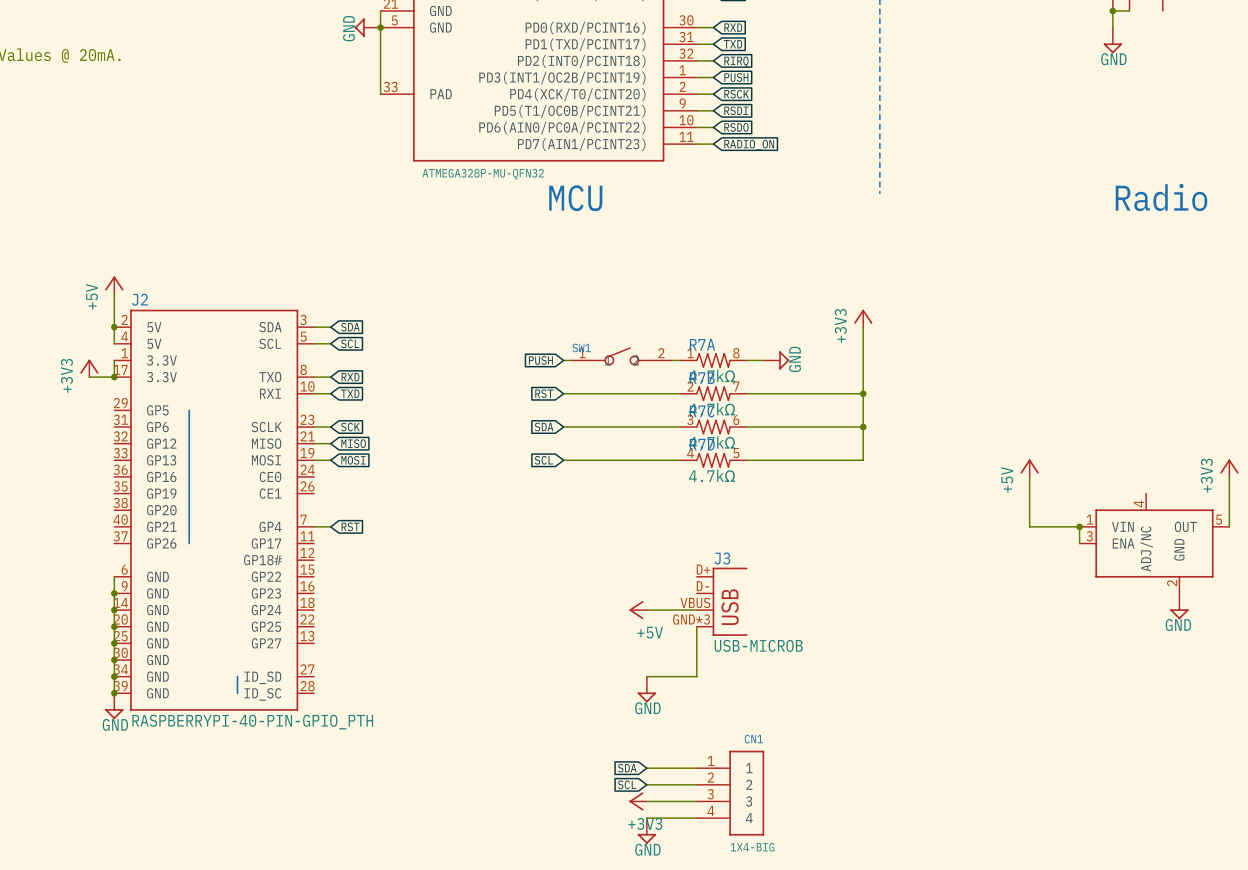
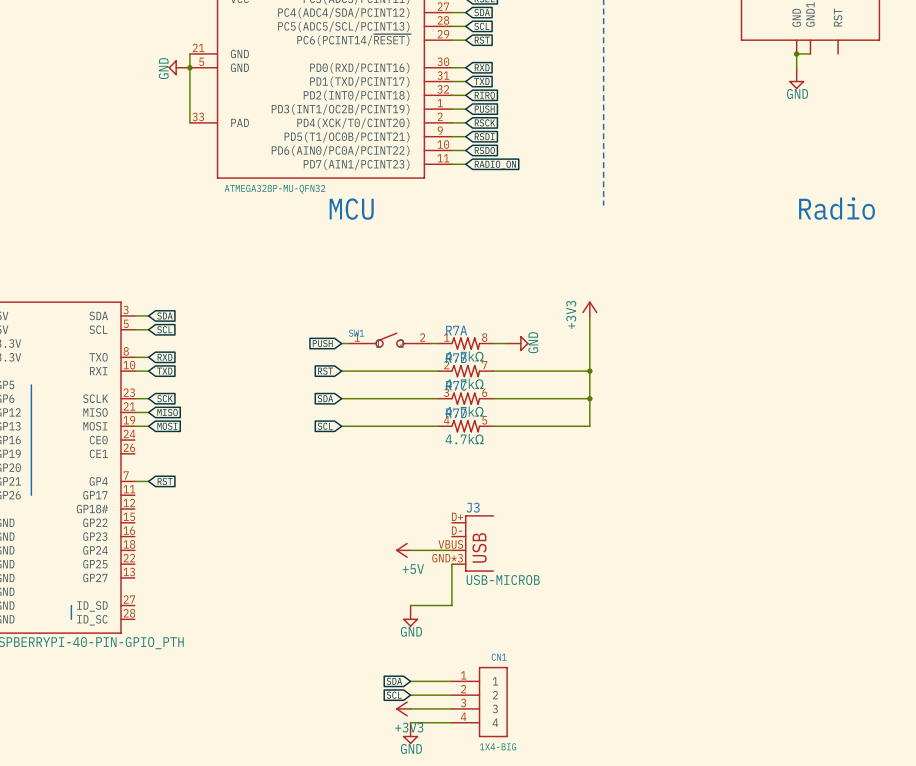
power symbol: +5V (1029, 468) -> none
power symbol: +3V3 (1229, 468) -> none
wire: (1029, 476) (1029, 526) (1079, 526) (1079, 543) -> none
wire: (1229, 476) (1229, 526) -> none
junction: (1079, 526) -> none
part: (1154, 543) -> none
power symbol: GND (1179, 606) -> none

